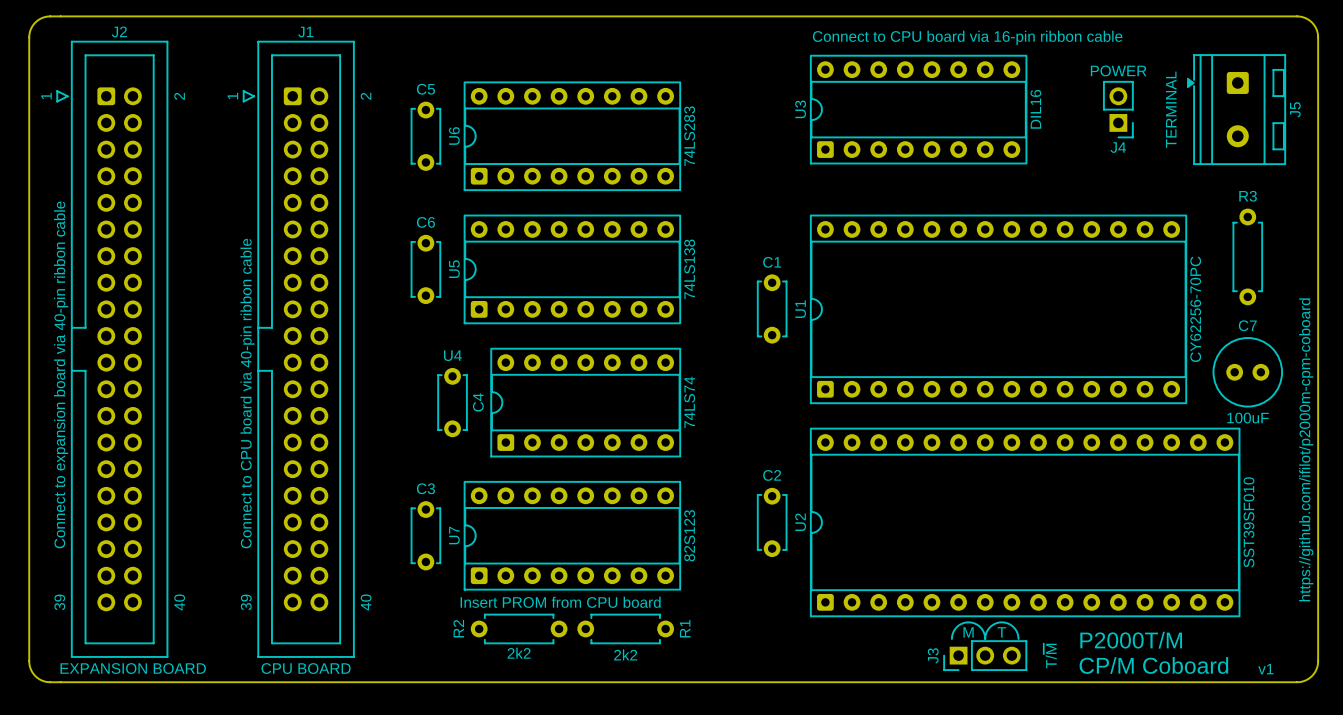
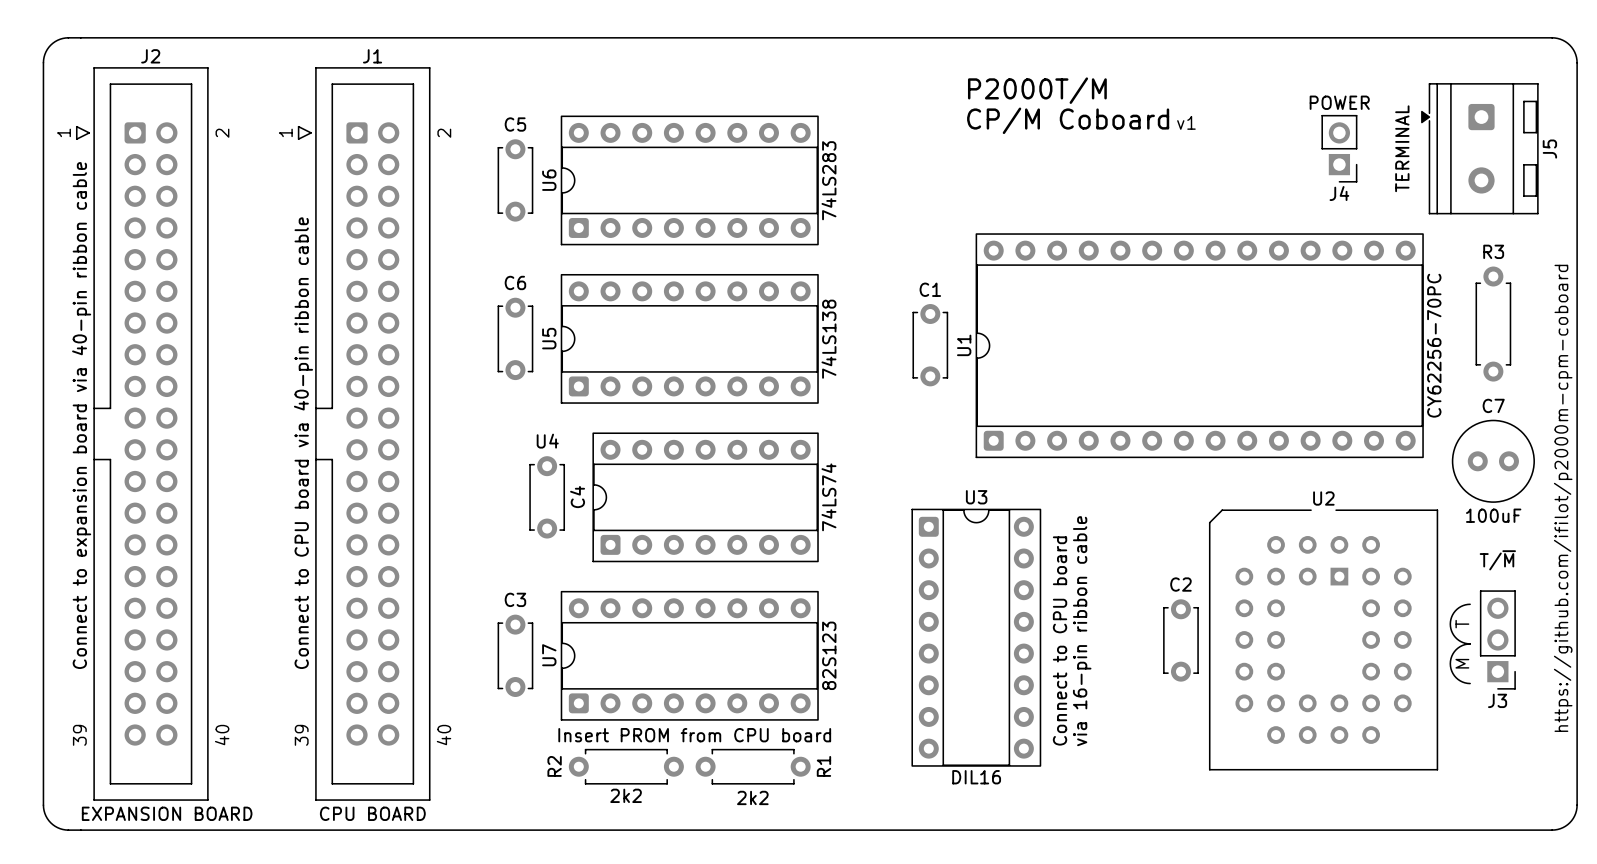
text: Connect to CPU board via 16-pin ribbon cable (967, 37) -> none
text: none -> P2000T/M (1037, 90)
text: none -> CP/M Coboard (1068, 120)
text: none -> v1 (1186, 122)
U3 rotation: 0° (918, 109) -> 90° clockwise (976, 637)
U3 position: (918, 109) -> (976, 637)
C1 position: (772, 308) -> (930, 345)
U1 position: (998, 309) -> (1199, 345)
U2 footprint: [810, 427, 1241, 617] -> [1208, 509, 1439, 771]
line: none -> (1470, 604) (1460, 606) (1455, 610) (1450, 624) (1452, 633) (1457, 638) (1470, 643) (1460, 646) (1454, 651) (1451, 658) (1451, 668) (1458, 679) (1470, 683)
C2 position: (772, 522) -> (1180, 640)
U2 name position: U2 (800, 522) -> U2 (1323, 498)
U2 value: SST39SF010 (1248, 522) -> none
text: none -> Connect to CPU board (1060, 640)
text: none -> via 16-pin ribbon cable (1082, 631)
text: none -> M (1462, 663)
text: M (968, 632) -> none
text rotation: 0° (1001, 632) -> 90° counterclockwise (1462, 624)
text position: T (1001, 632) -> T (1462, 624)
line: (951, 638) (955, 628) (964, 622) (972, 622) (978, 625) (983, 632) (985, 638) (990, 626) (1001, 622) (1012, 626) (1018, 638) -> none
text: P2000T/M (1131, 640) -> none
J3 rotation: 0° (985, 655) -> 90° counterclockwise (1497, 639)
J3 position: (985, 655) -> (1497, 639)
text: CP/M Coboard (1153, 665) -> none
text: v1 (1265, 669) -> none

